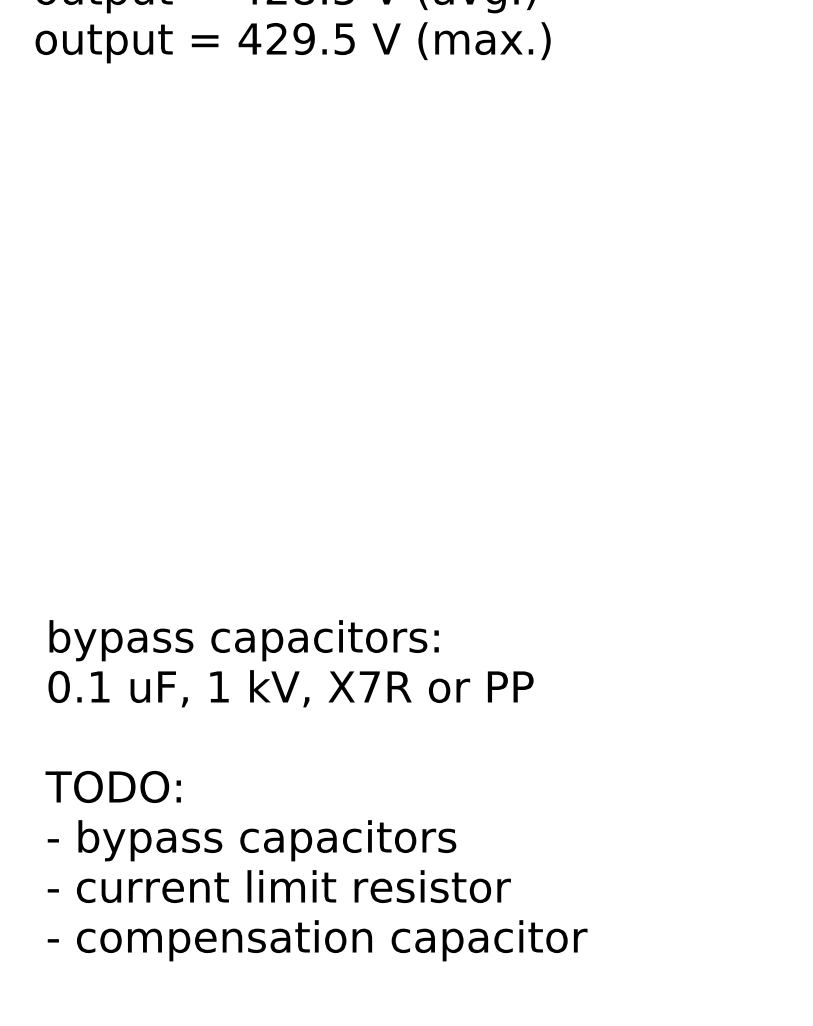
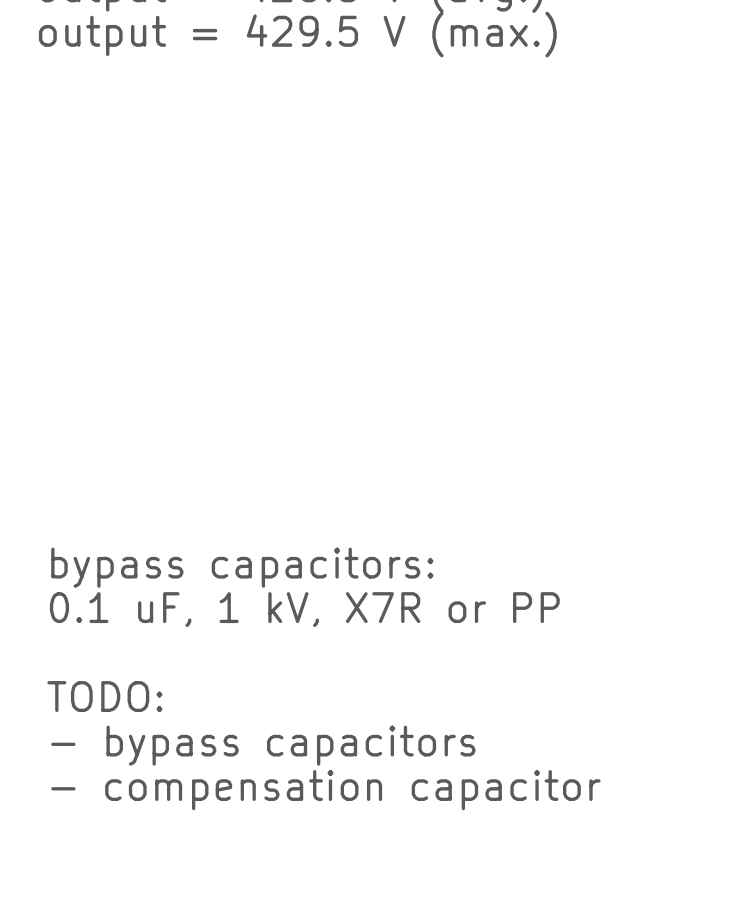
text: - current limit resistor (279, 886) -> - compensation capacitor (325, 790)
text: - compensation capacitor (317, 940) -> none

